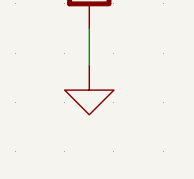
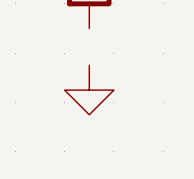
wire: (89, 28) (89, 65) -> none

